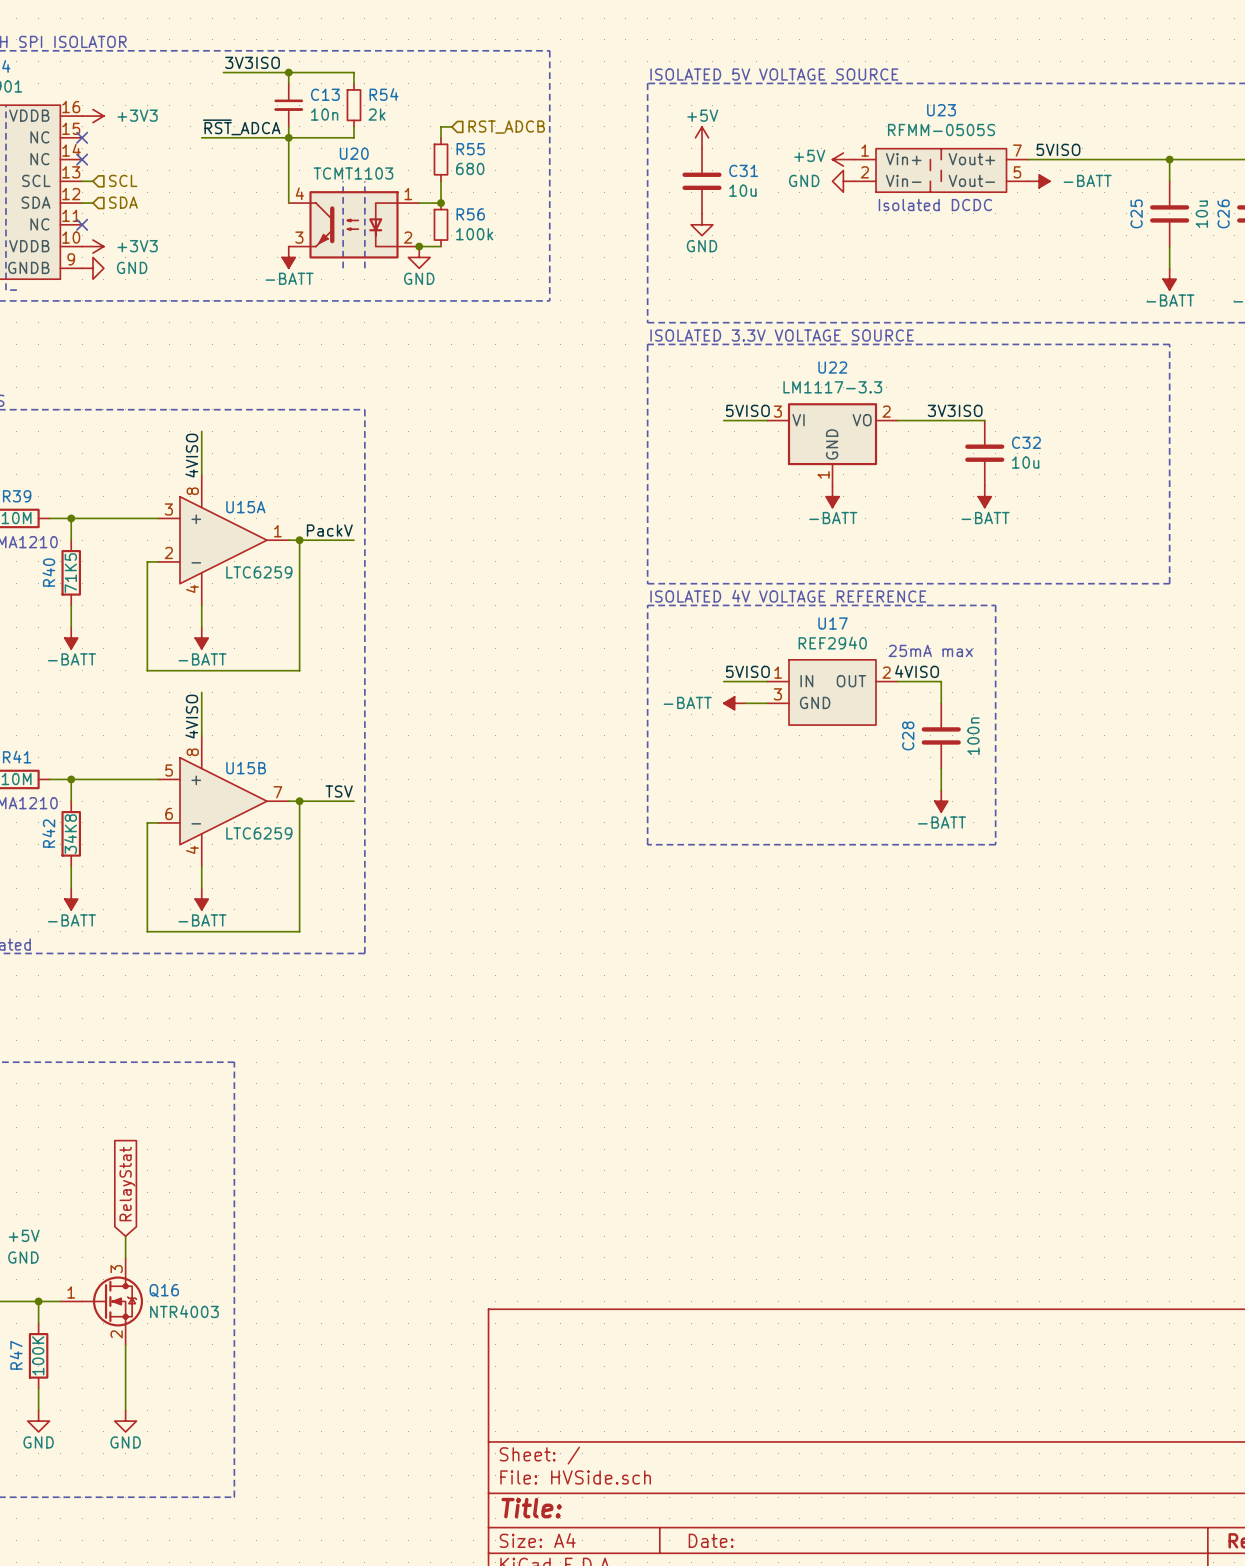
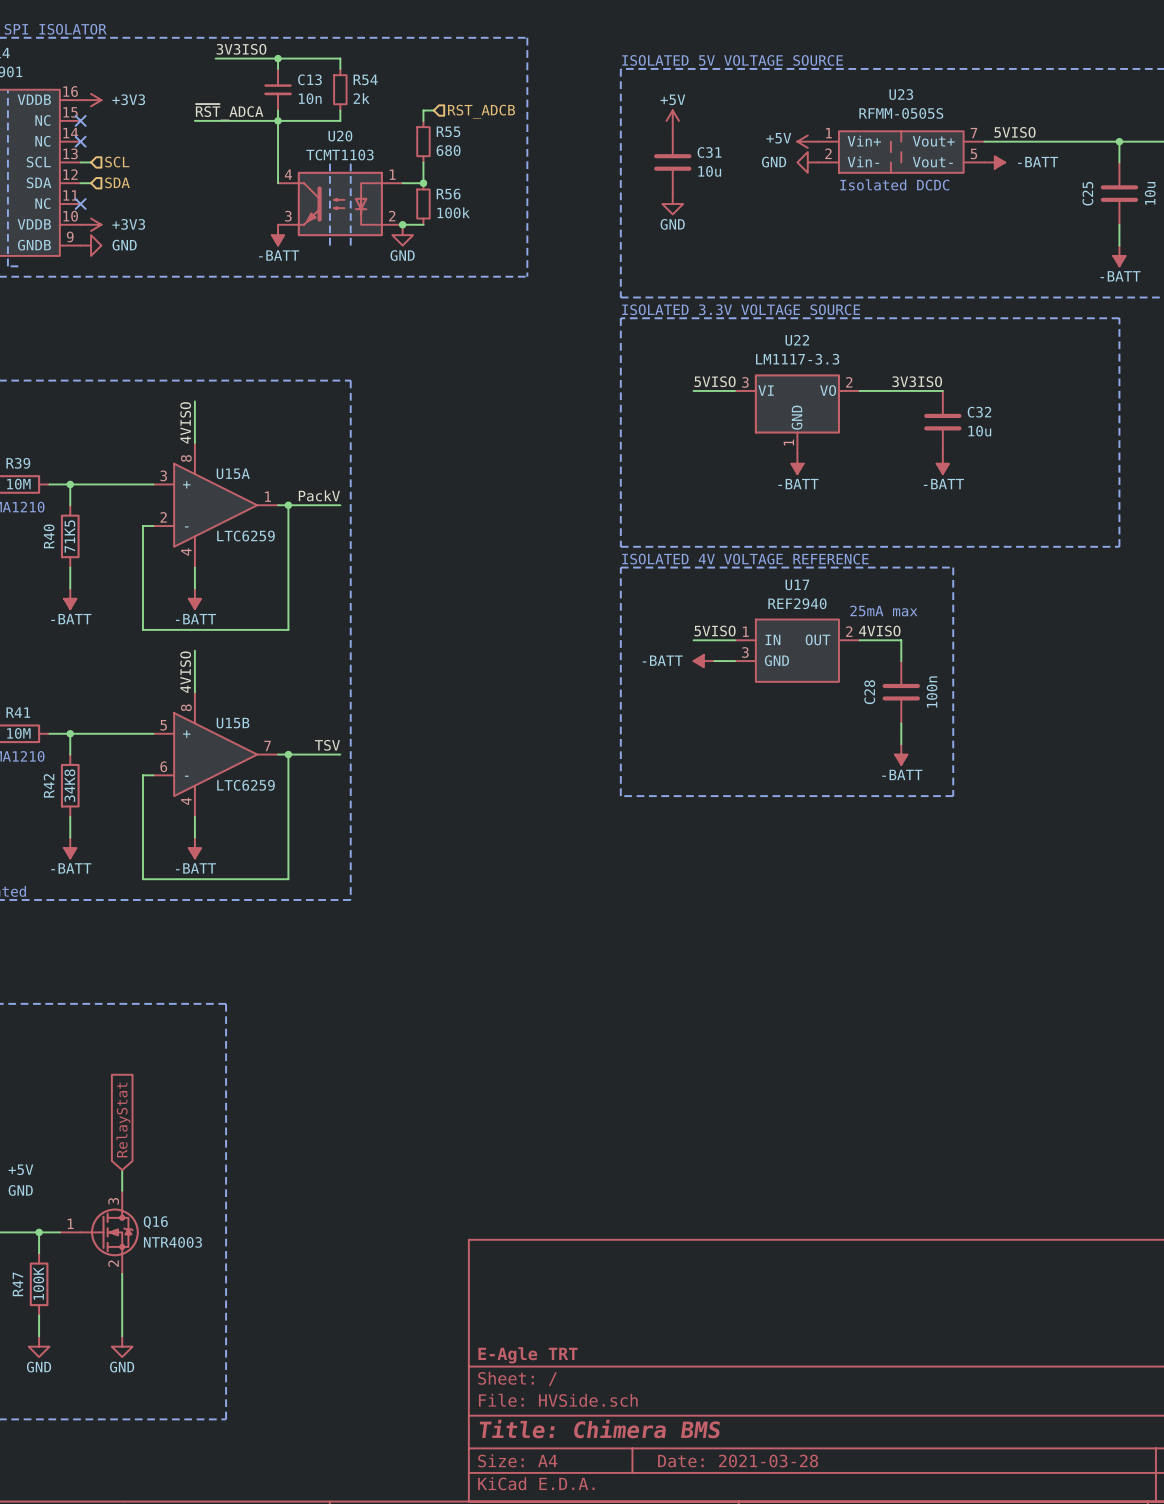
title block: none -> E-Agle TRT (528, 1355)
title block: Title: (531, 1508) -> Title: Chimera BMS (599, 1429)
title block: Date: (711, 1540) -> Date: 2021-03-28 (738, 1461)

